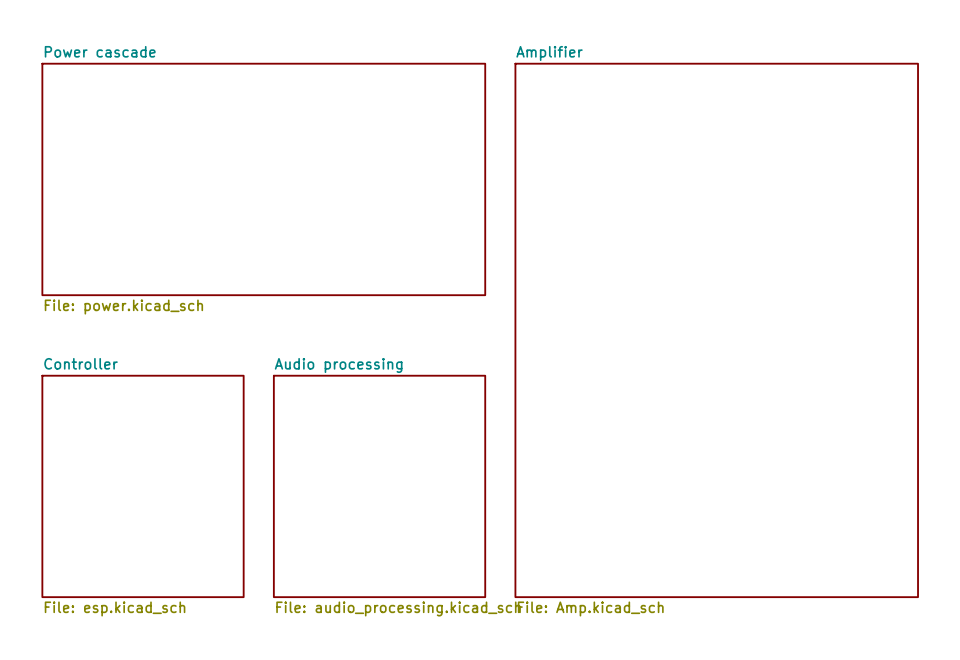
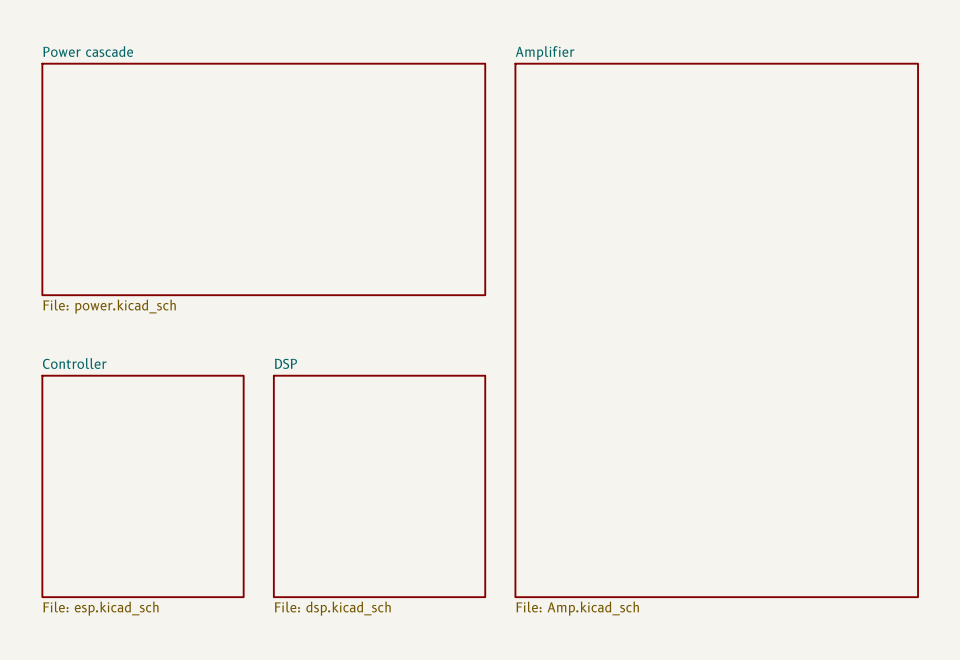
sheet Audio processing name: Audio processing (338, 365) -> DSP (285, 363)
sheet Audio processing value: File: audio_processing.kicad_sch (398, 608) -> File: dsp.kicad_sch (332, 608)

